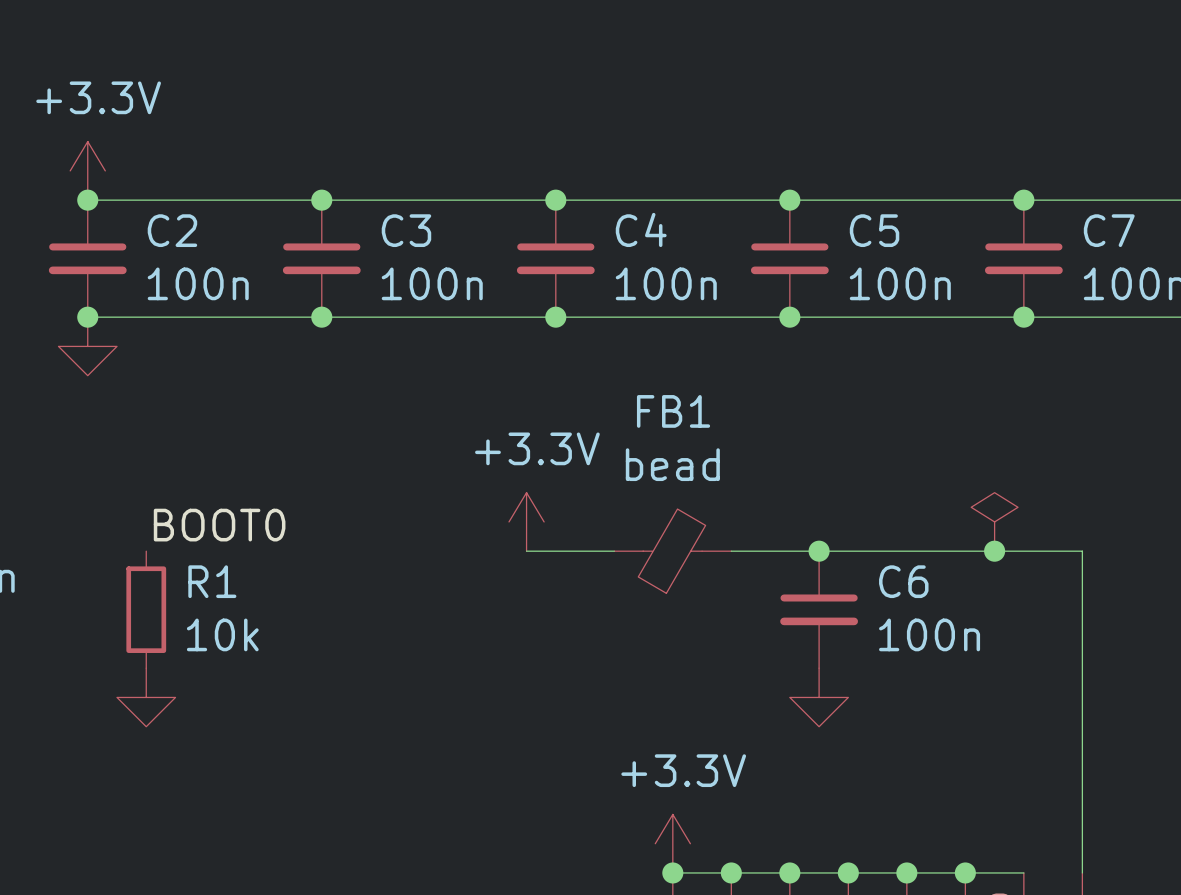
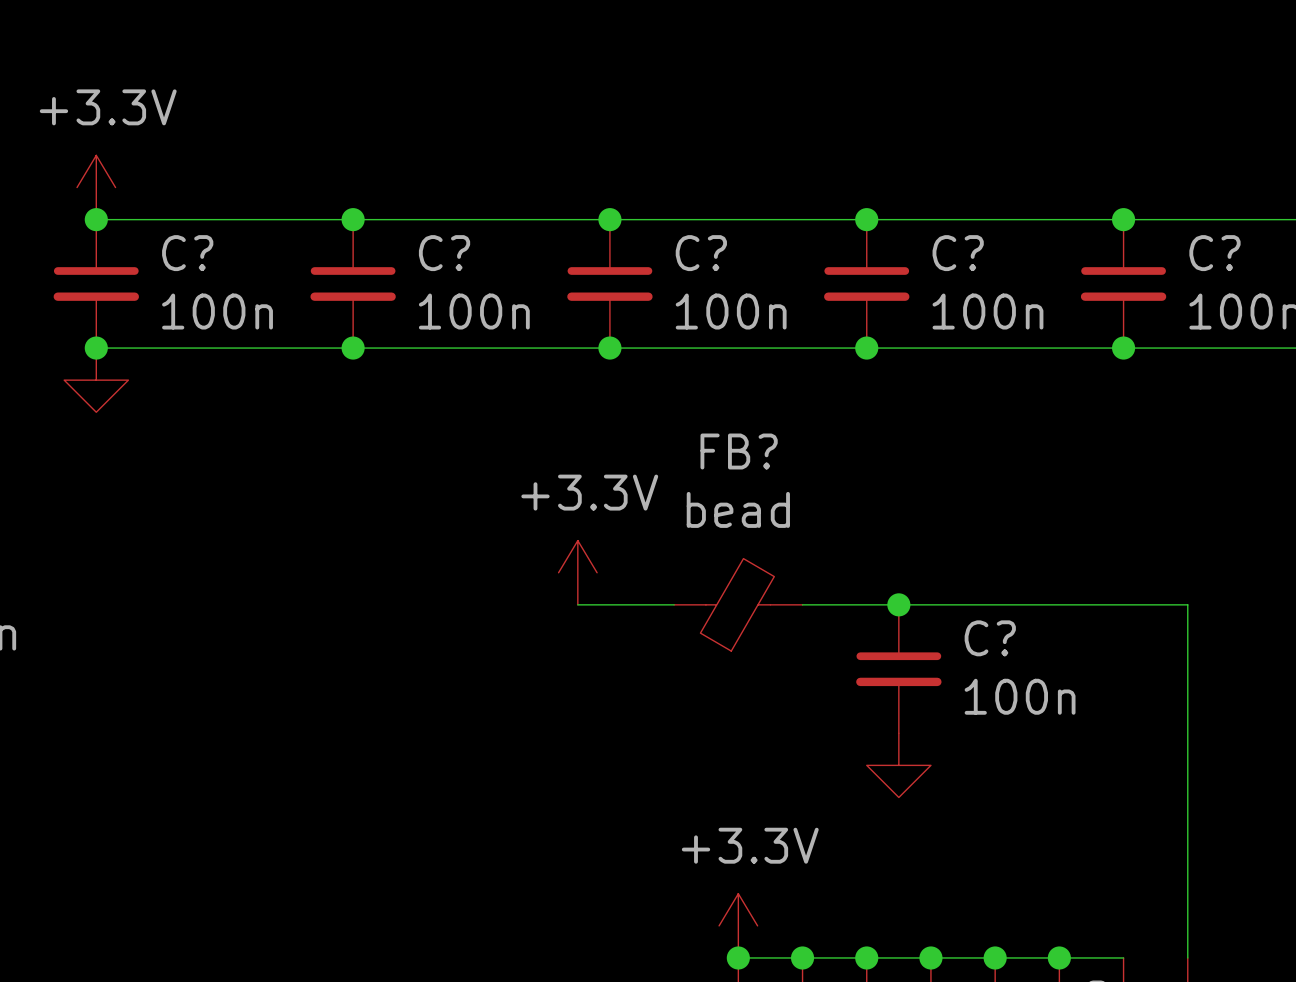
C4 name: C4 (641, 229) -> C? (701, 253)
C2 name: C2 (172, 230) -> C? (187, 253)
C3 name: C3 (406, 230) -> C? (444, 253)
C5 name: C5 (874, 230) -> C? (958, 253)
C7 name: C7 (1109, 230) -> C? (1214, 253)
FB1 name: FB1 (673, 411) -> FB? (739, 451)
power symbol: (994, 521) -> none
label: BOOT0 (219, 525) -> none
junction: (994, 551) -> none
C6 name: C6 (903, 581) -> C? (990, 638)
R1: 10k (146, 609) -> none
power symbol: (146, 697) -> none

